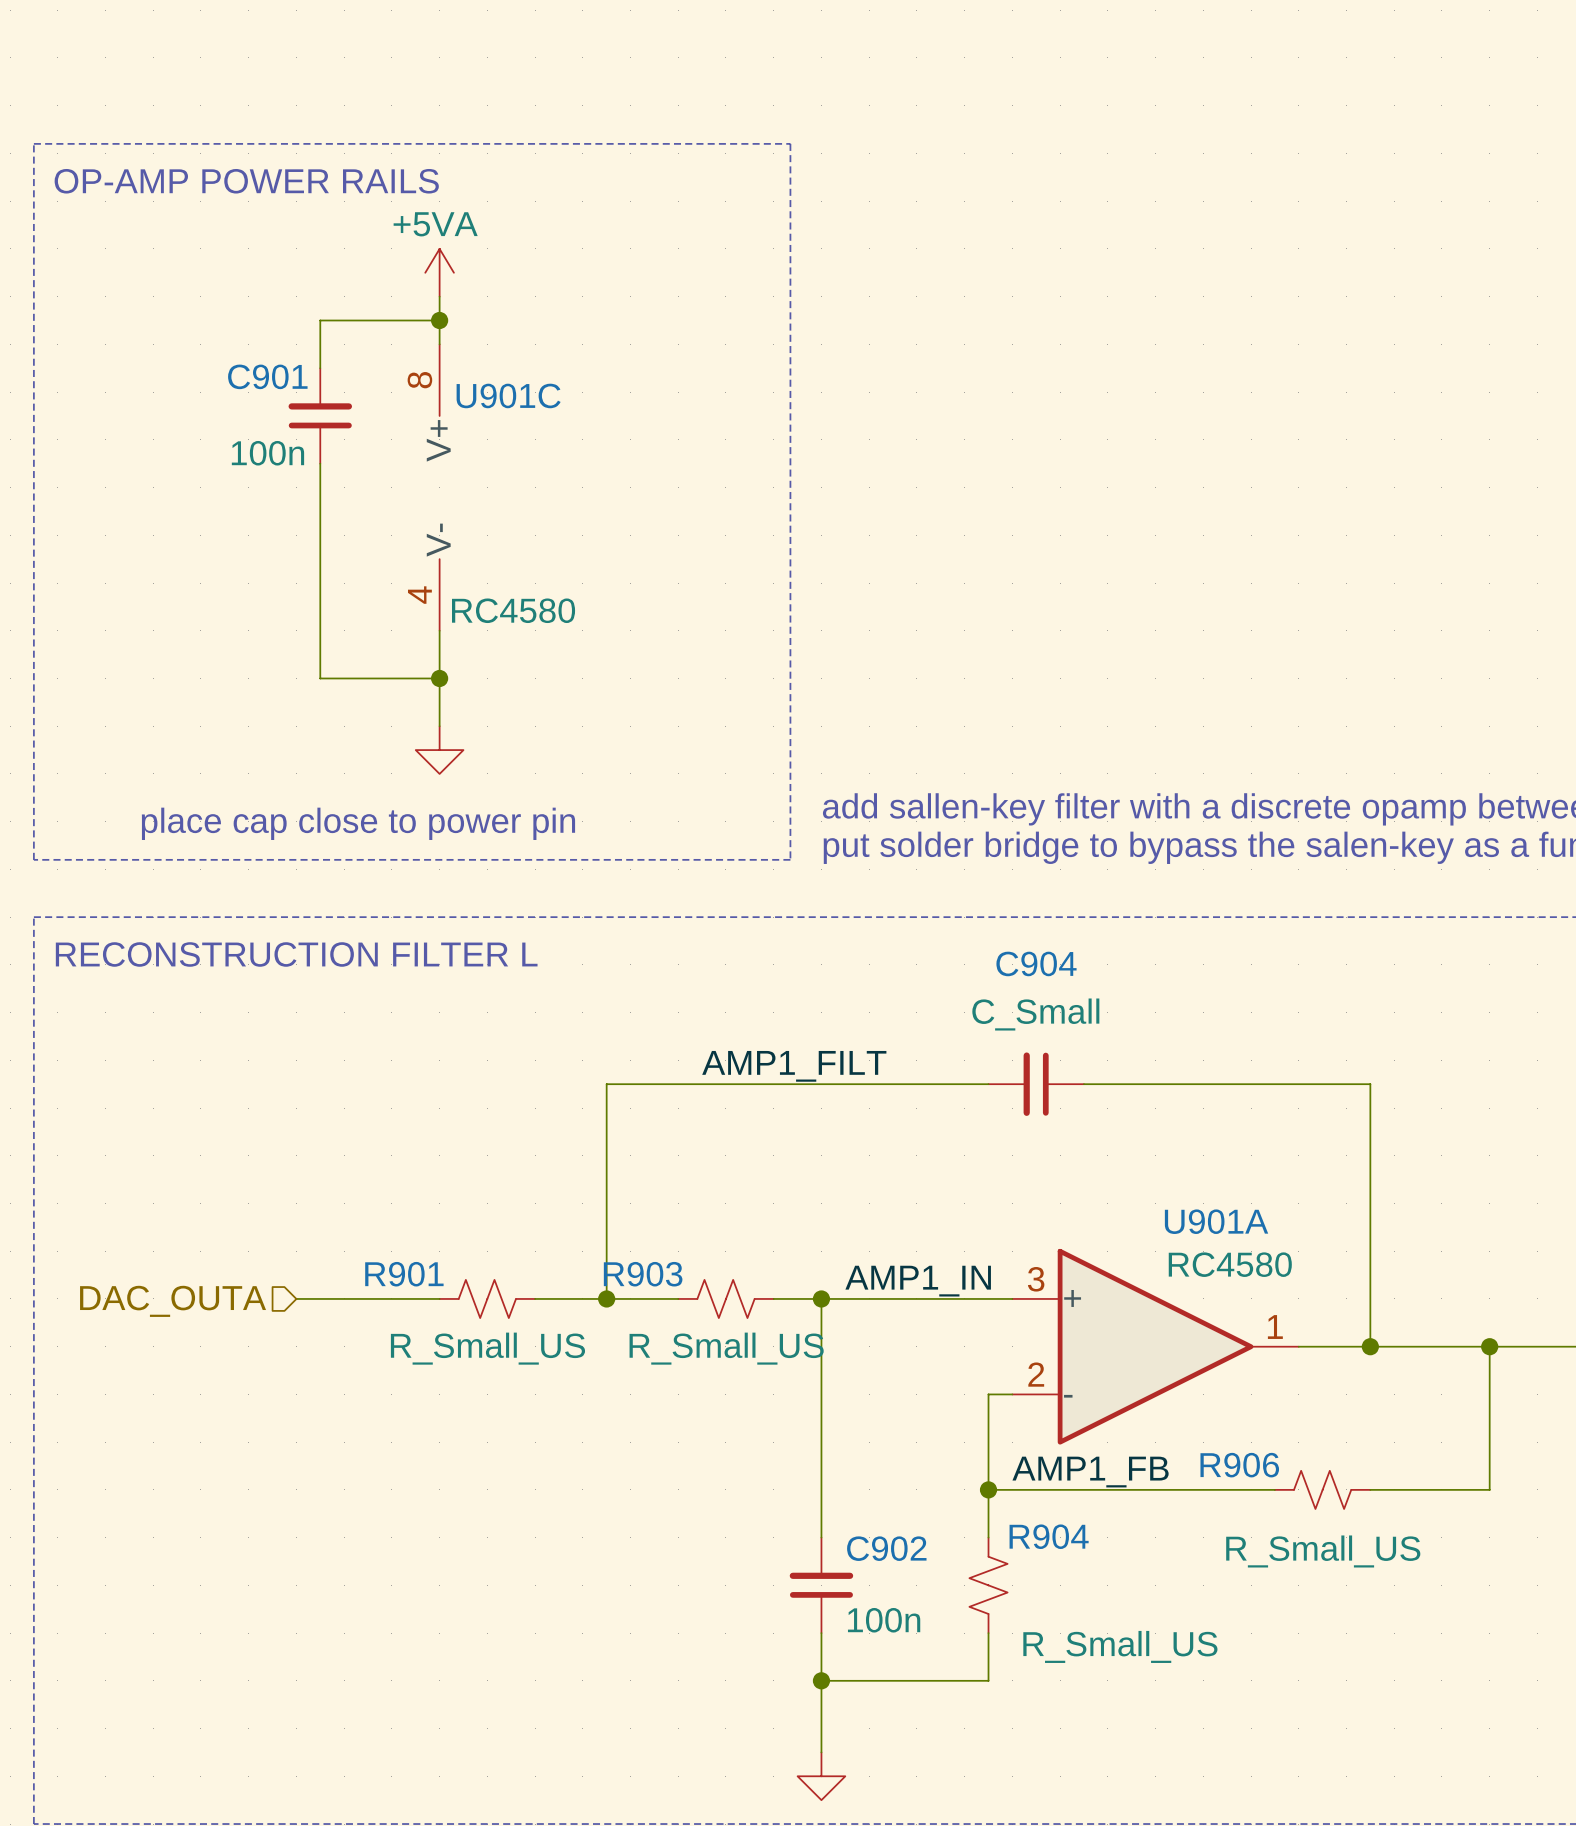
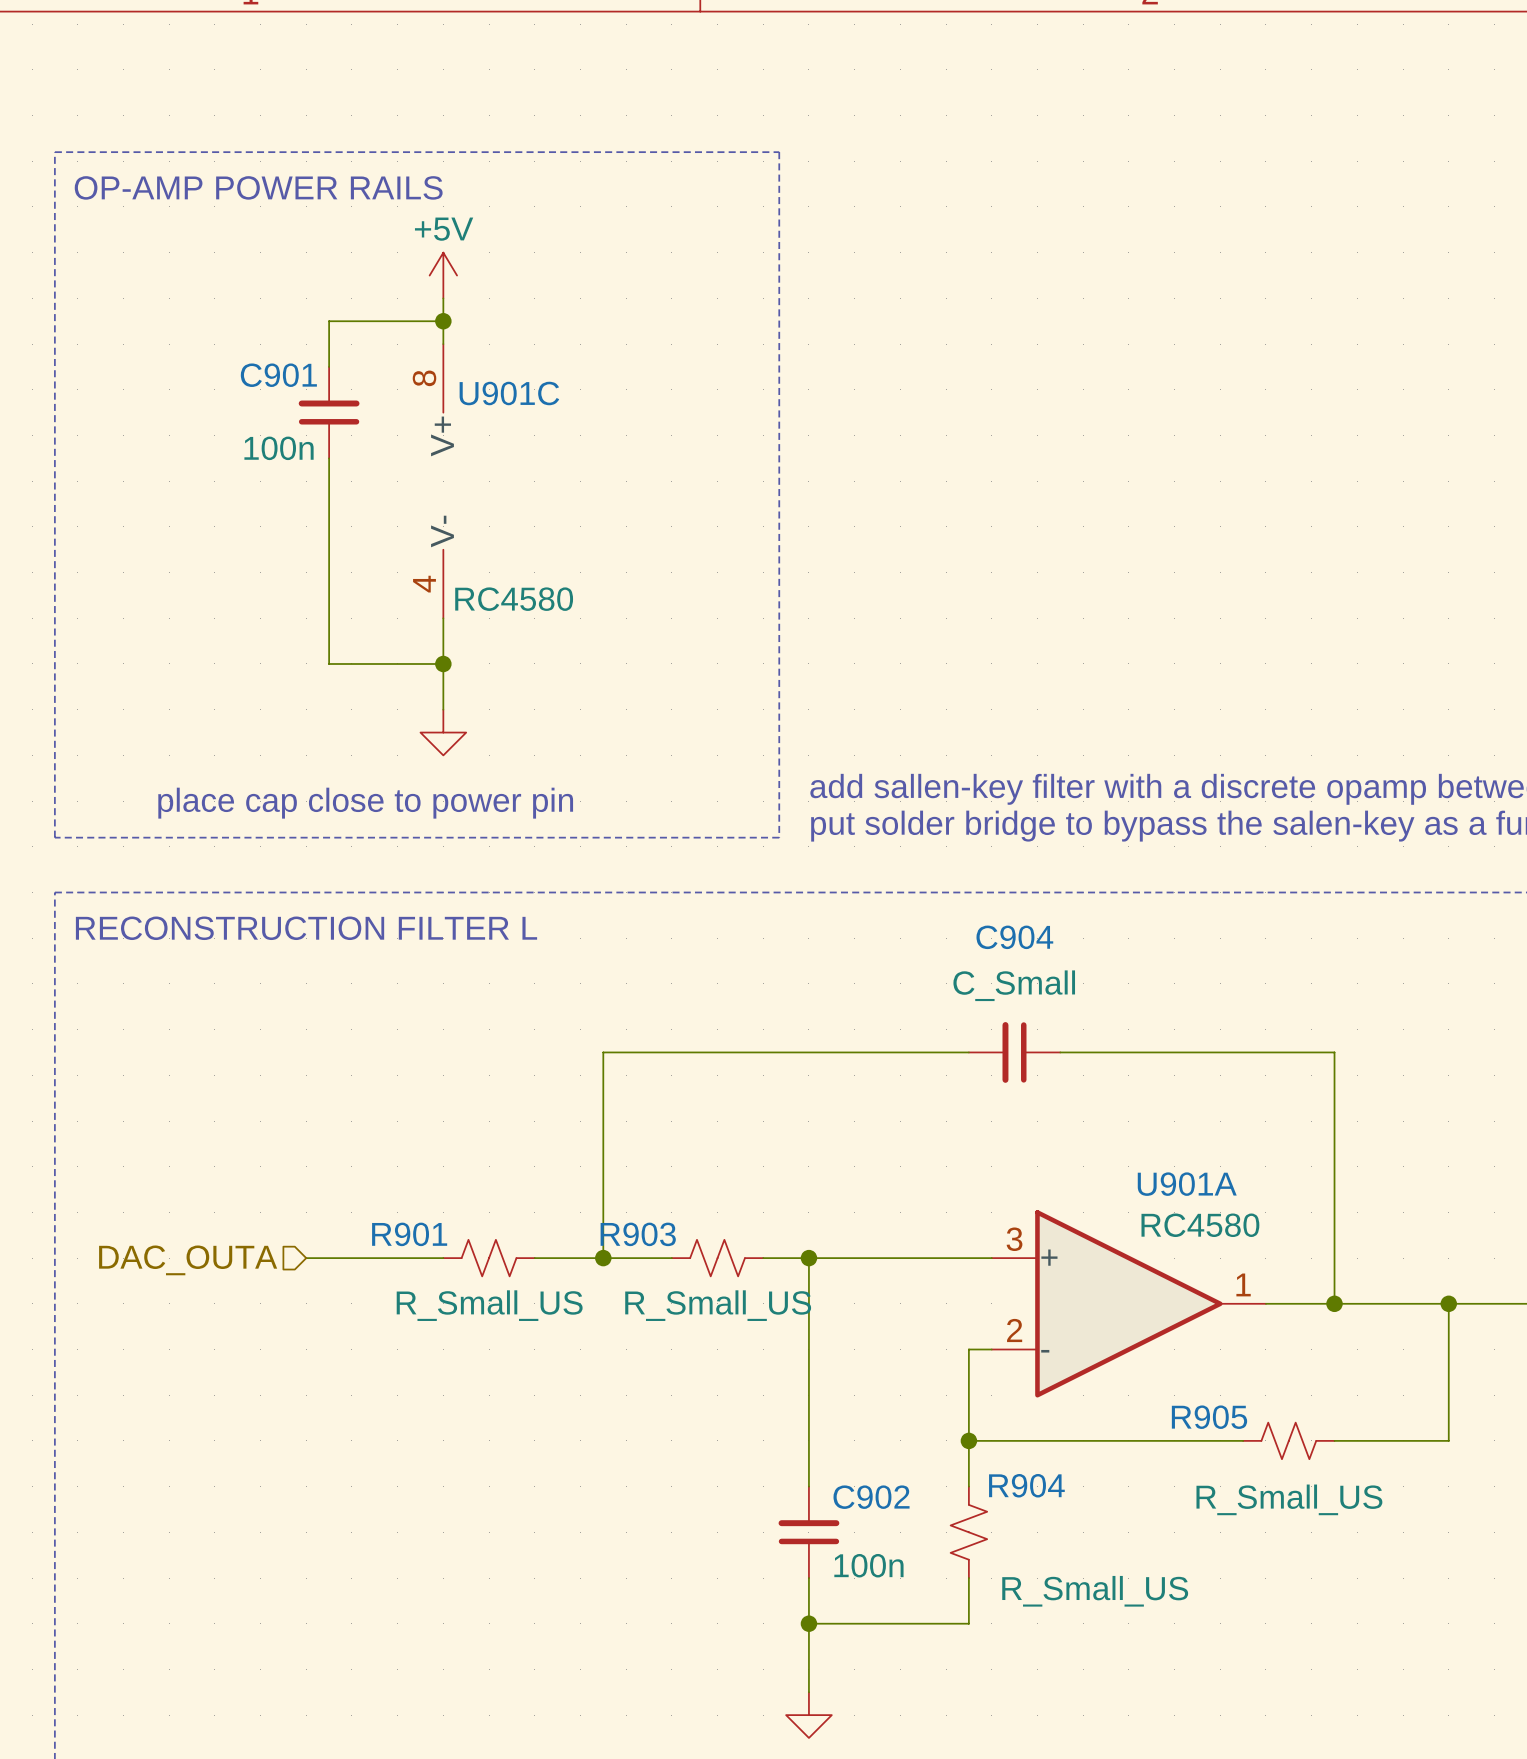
power symbol: +5VA (439, 272) -> +5V (443, 275)
label: AMP1_FILT (794, 1066) -> none
label: AMP1_IN (918, 1281) -> none
R906 name: R906 (1239, 1465) -> R905 (1209, 1417)
label: AMP1_FB (1090, 1472) -> none

